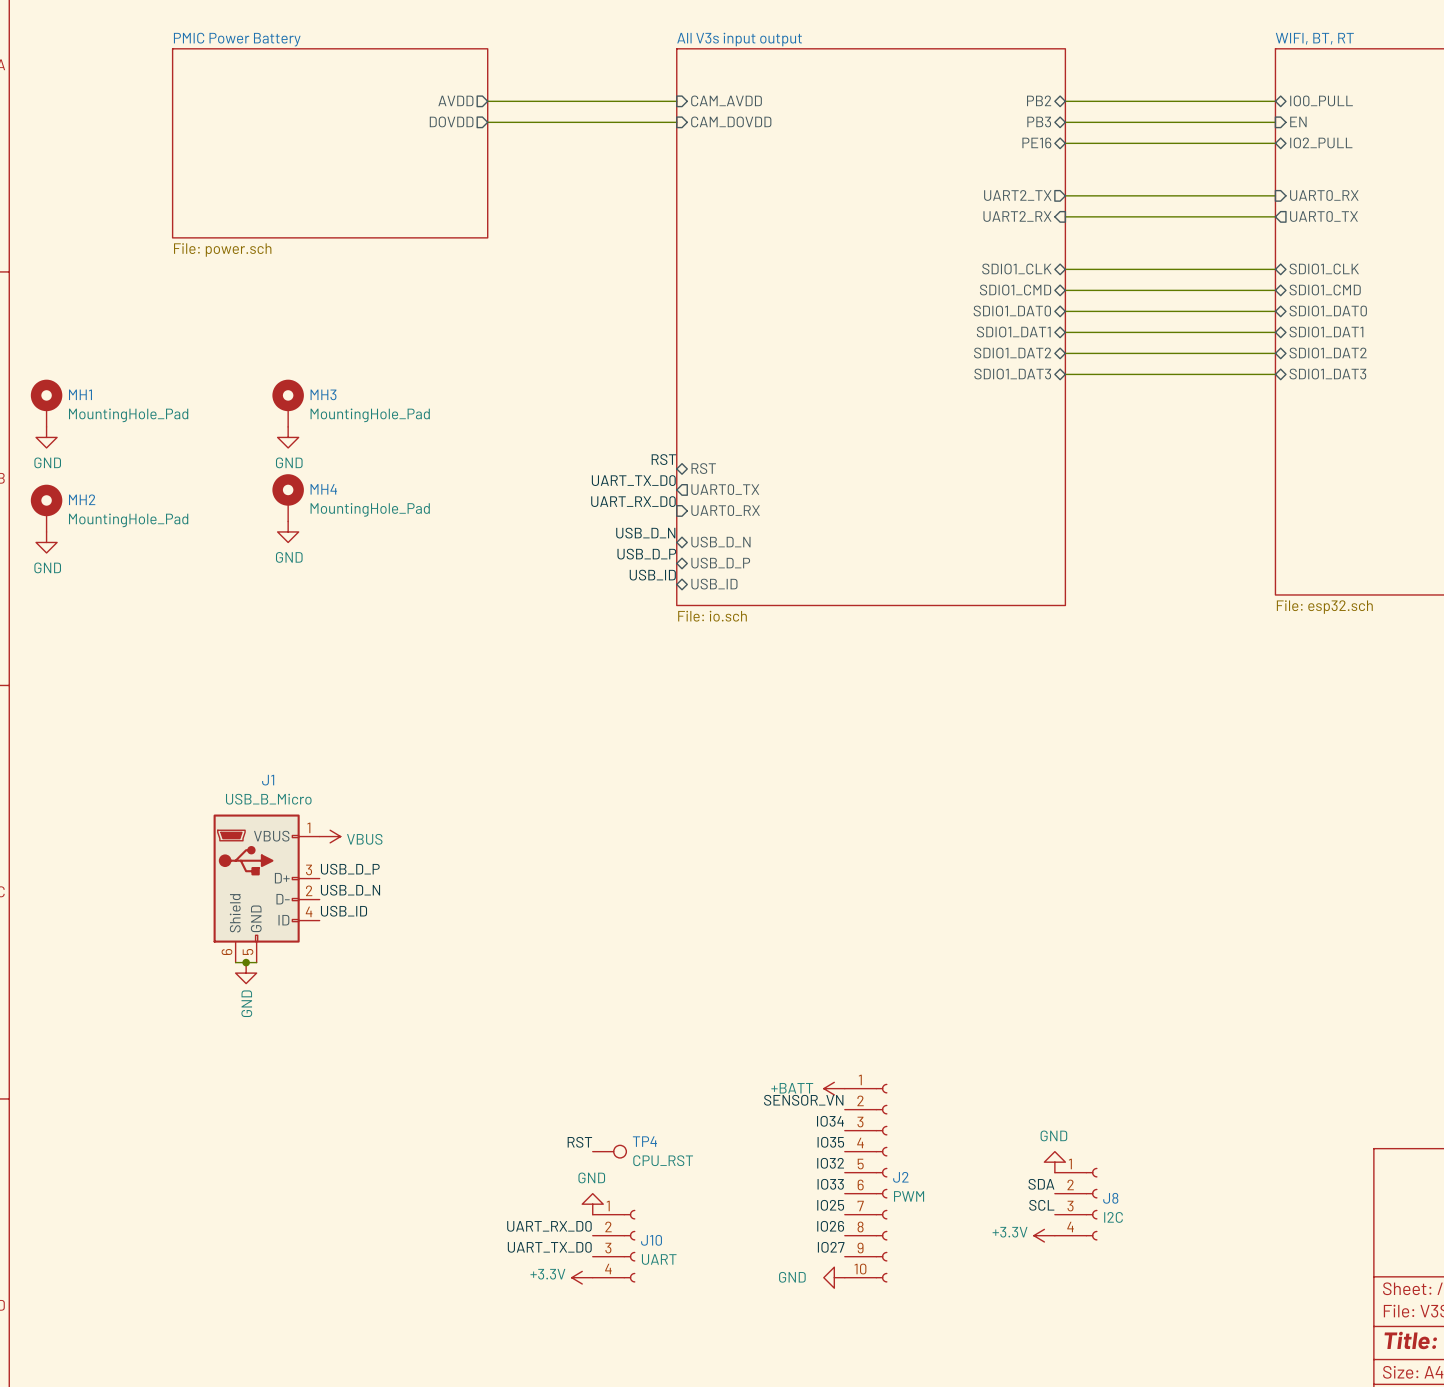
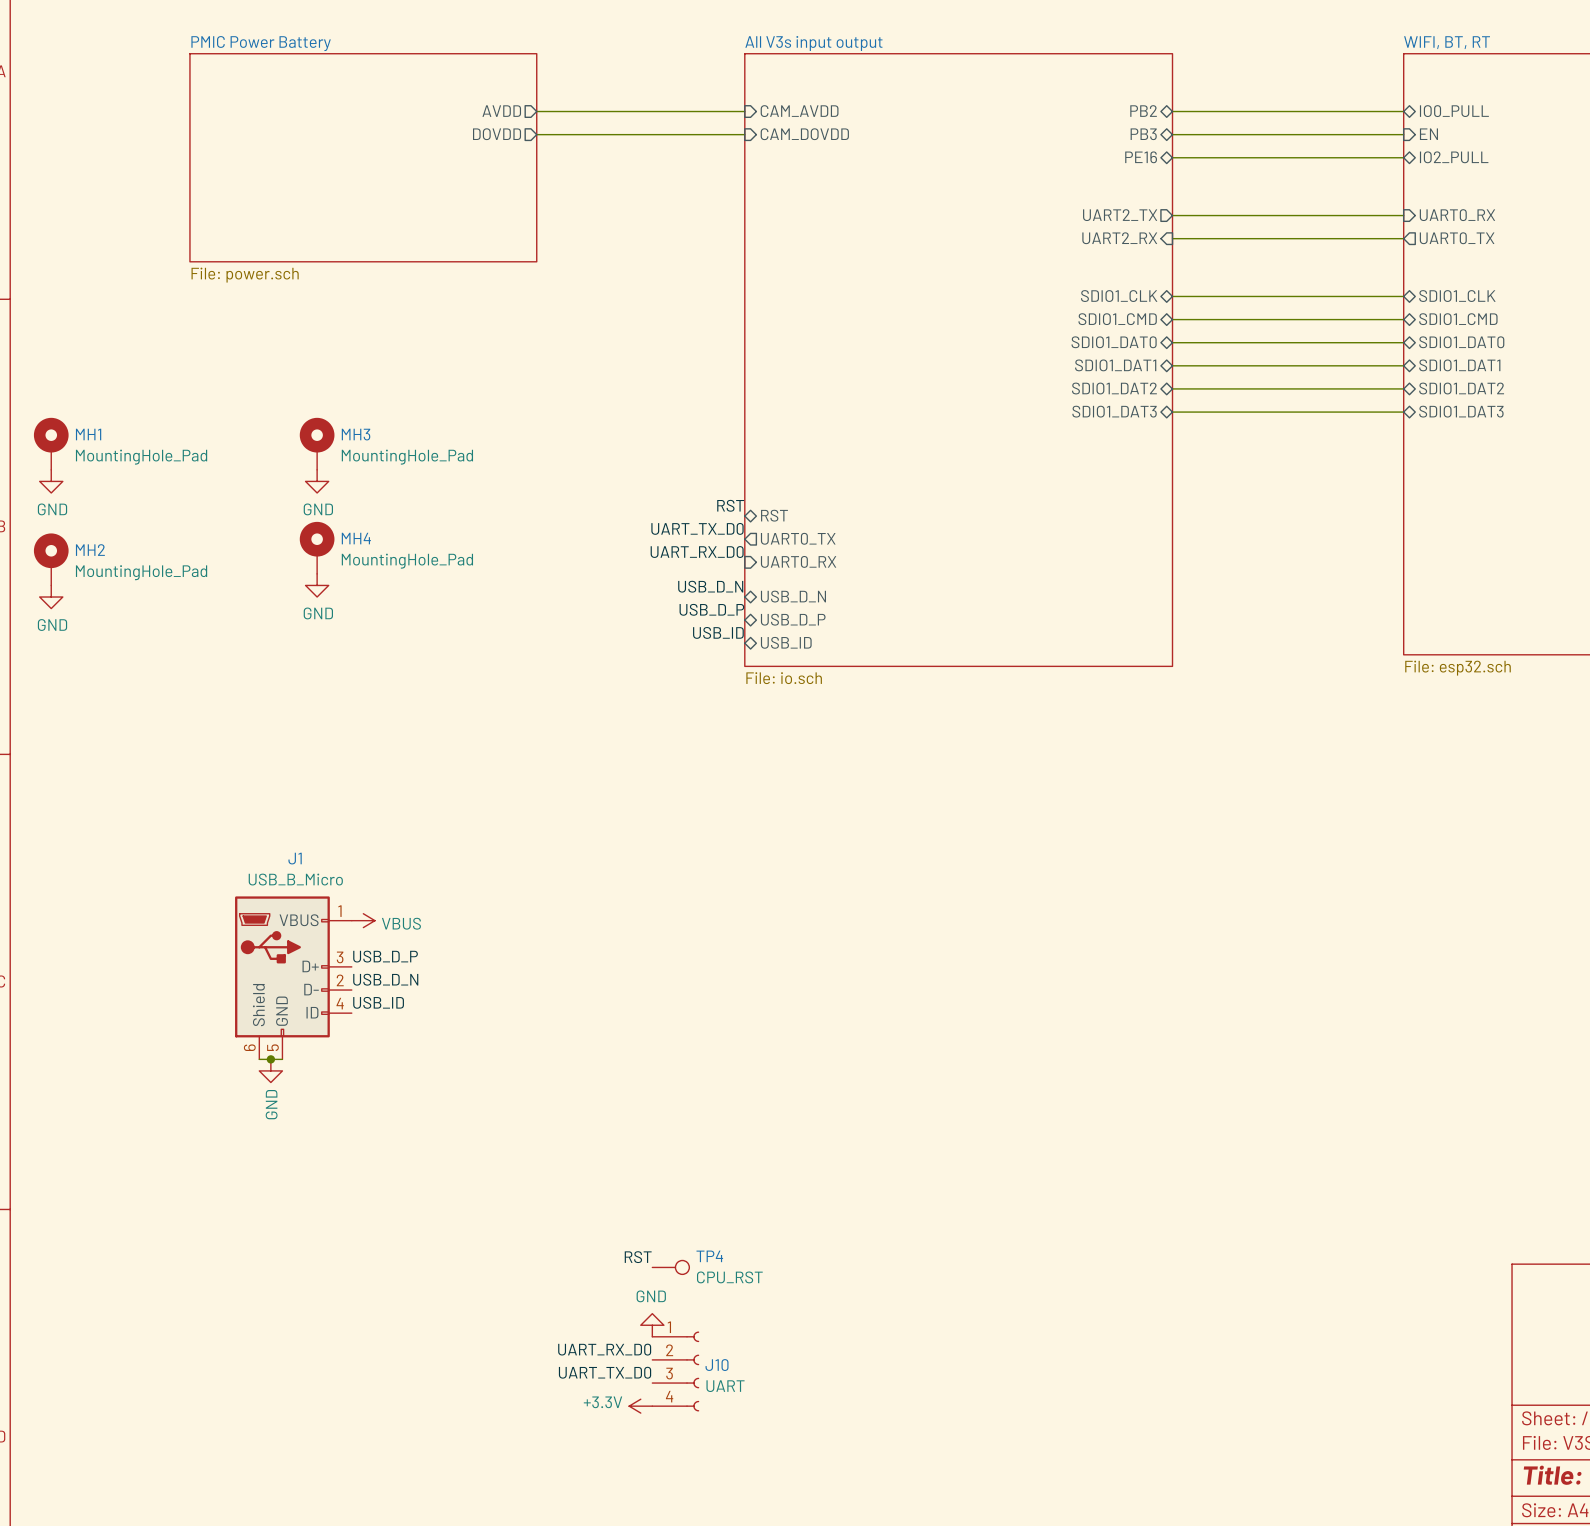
power symbol: +BATT (834, 1088) -> none
label: SENSOR_VN (803, 1100) -> none
label: IO34 (830, 1121) -> none
label: IO35 (830, 1142) -> none
power symbol: GND (1054, 1162) -> none
label: IO32 (830, 1163) -> none
J2: PWM (866, 1183) -> none
label: IO33 (830, 1184) -> none
label: SDA (1041, 1184) -> none
J8: I2C (1076, 1204) -> none
label: IO25 (830, 1205) -> none
label: SCL (1041, 1205) -> none
label: IO26 (830, 1226) -> none
power symbol: +3.3V (1044, 1235) -> none
label: IO27 (831, 1247) -> none
power symbol: GND (834, 1277) -> none

